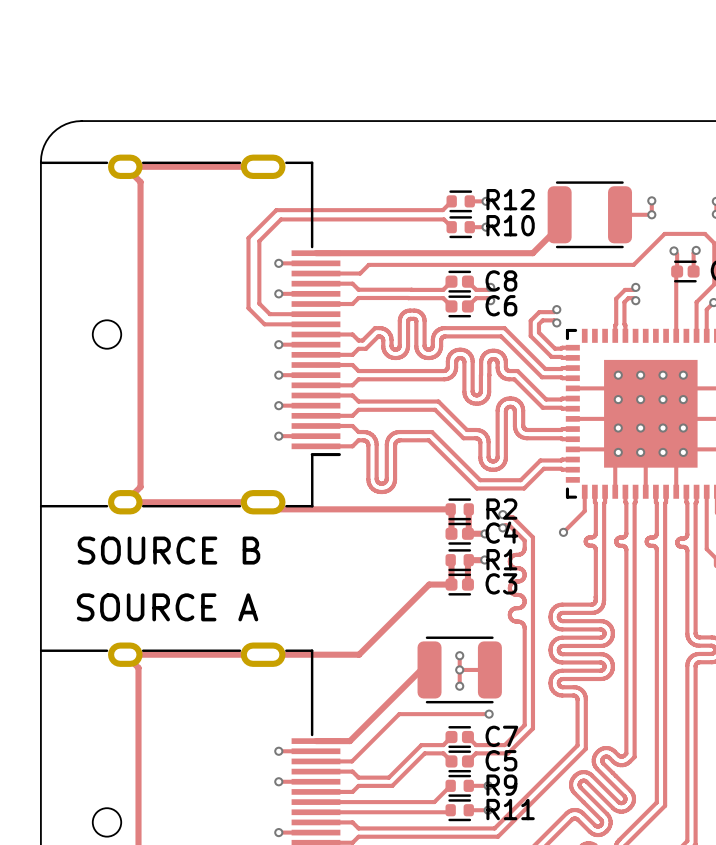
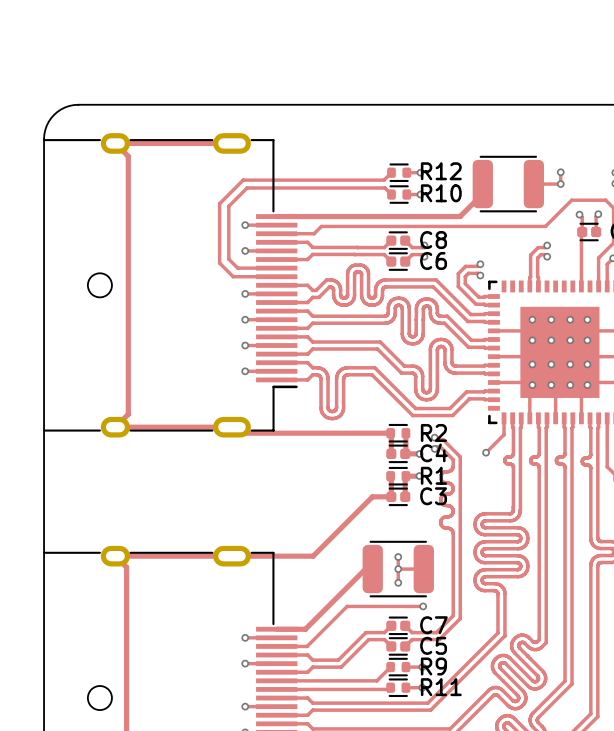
text: SOURCE B (168, 550) -> none
text: SOURCE A (167, 607) -> none

